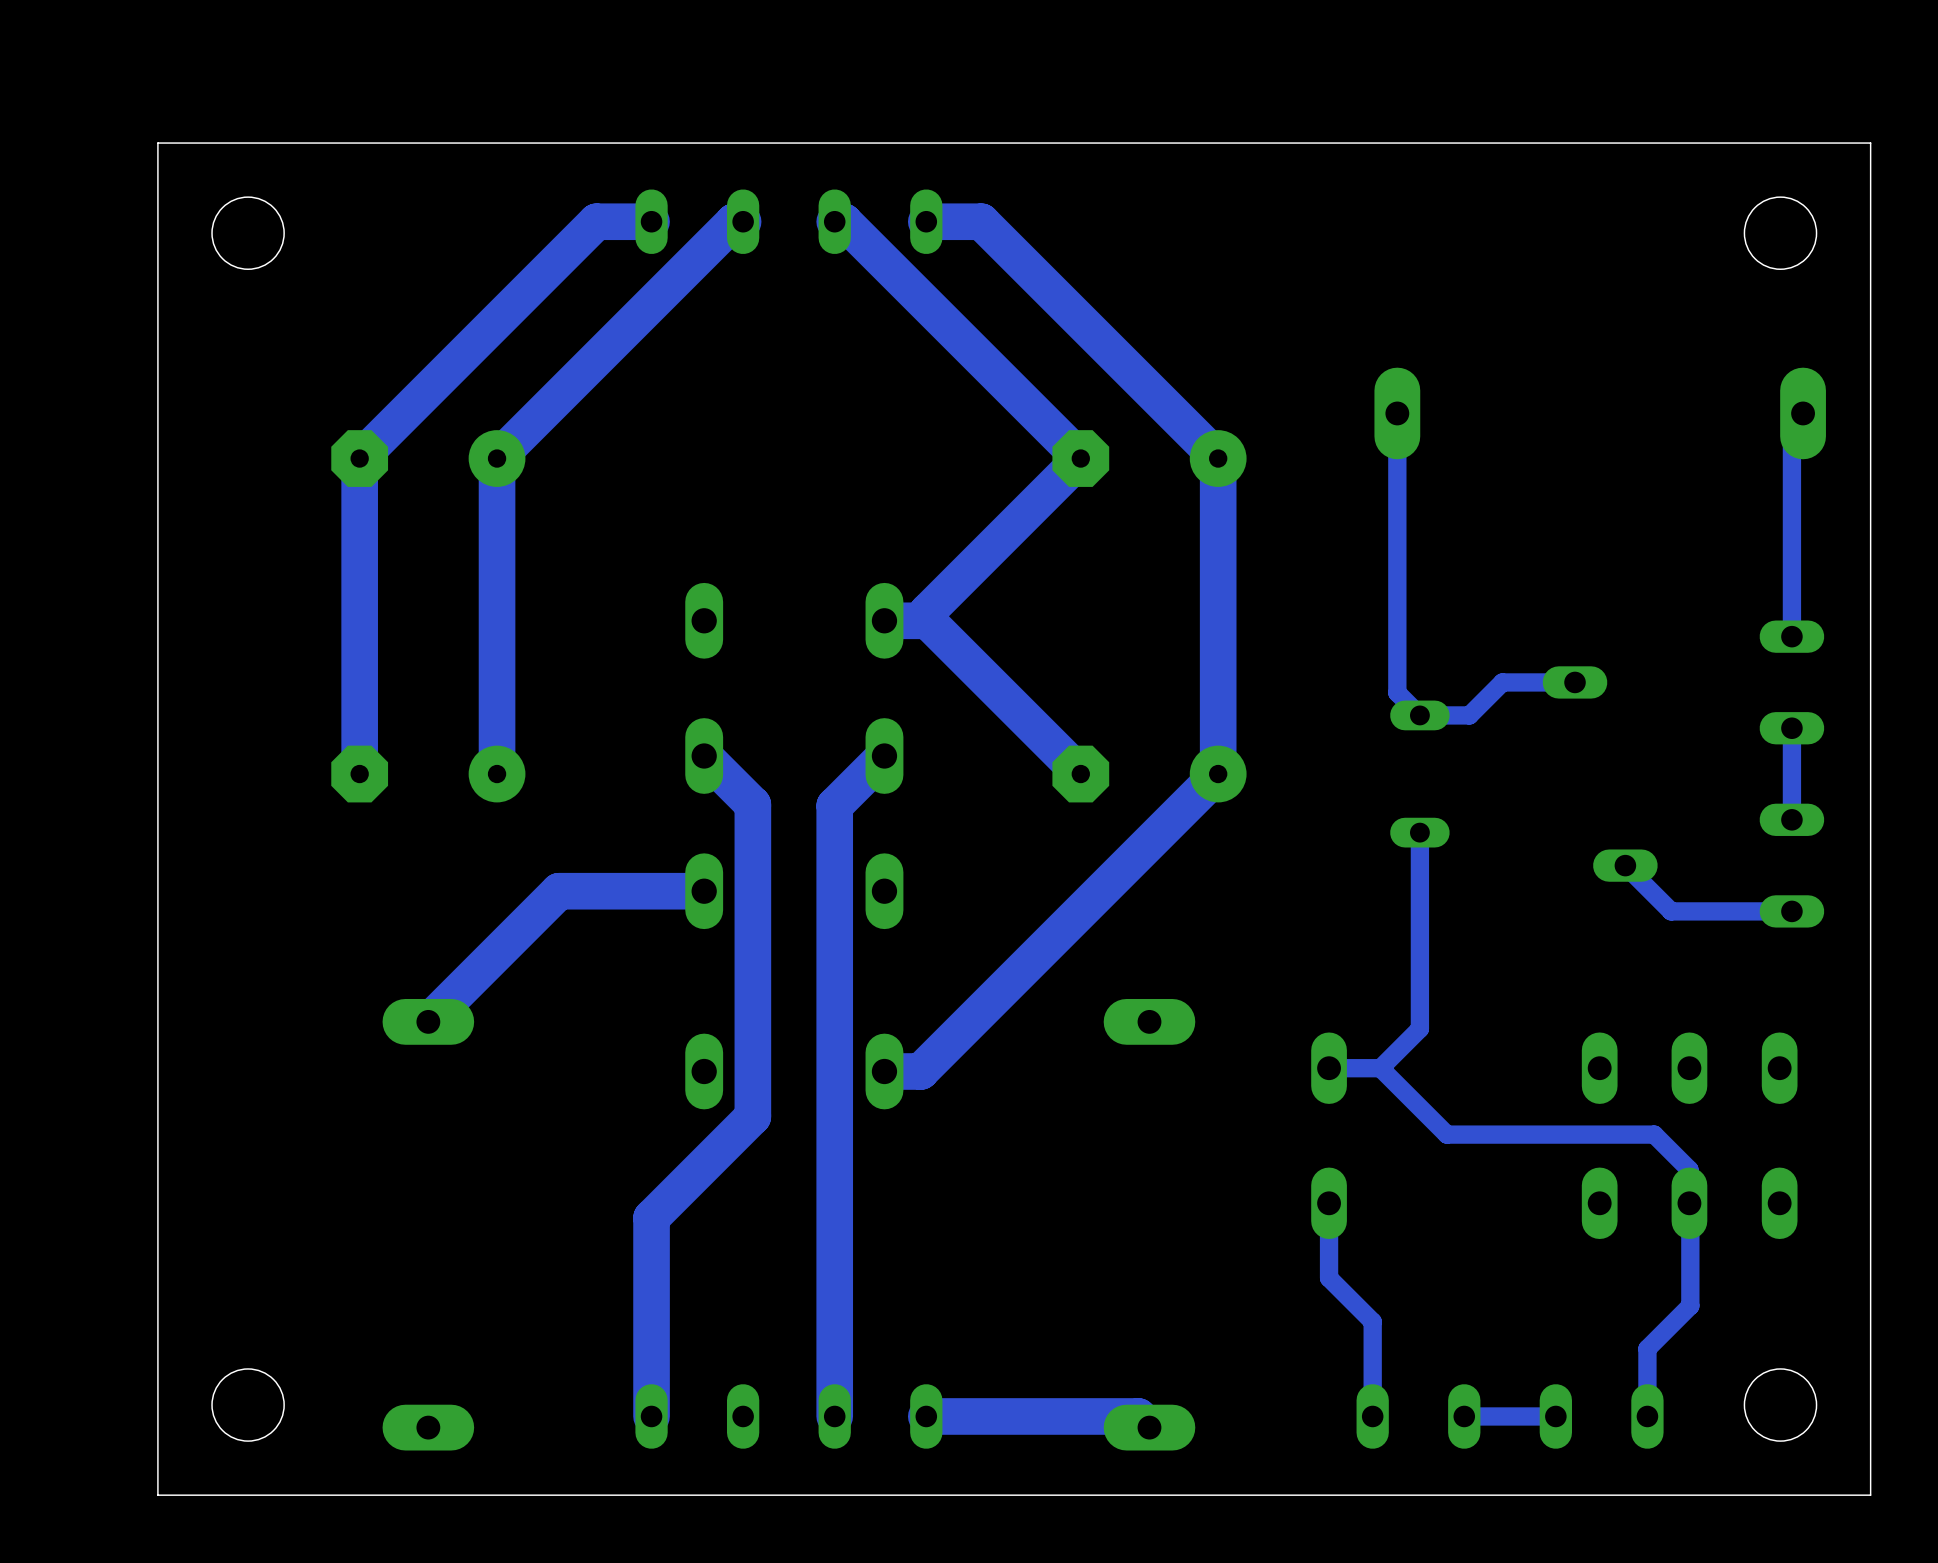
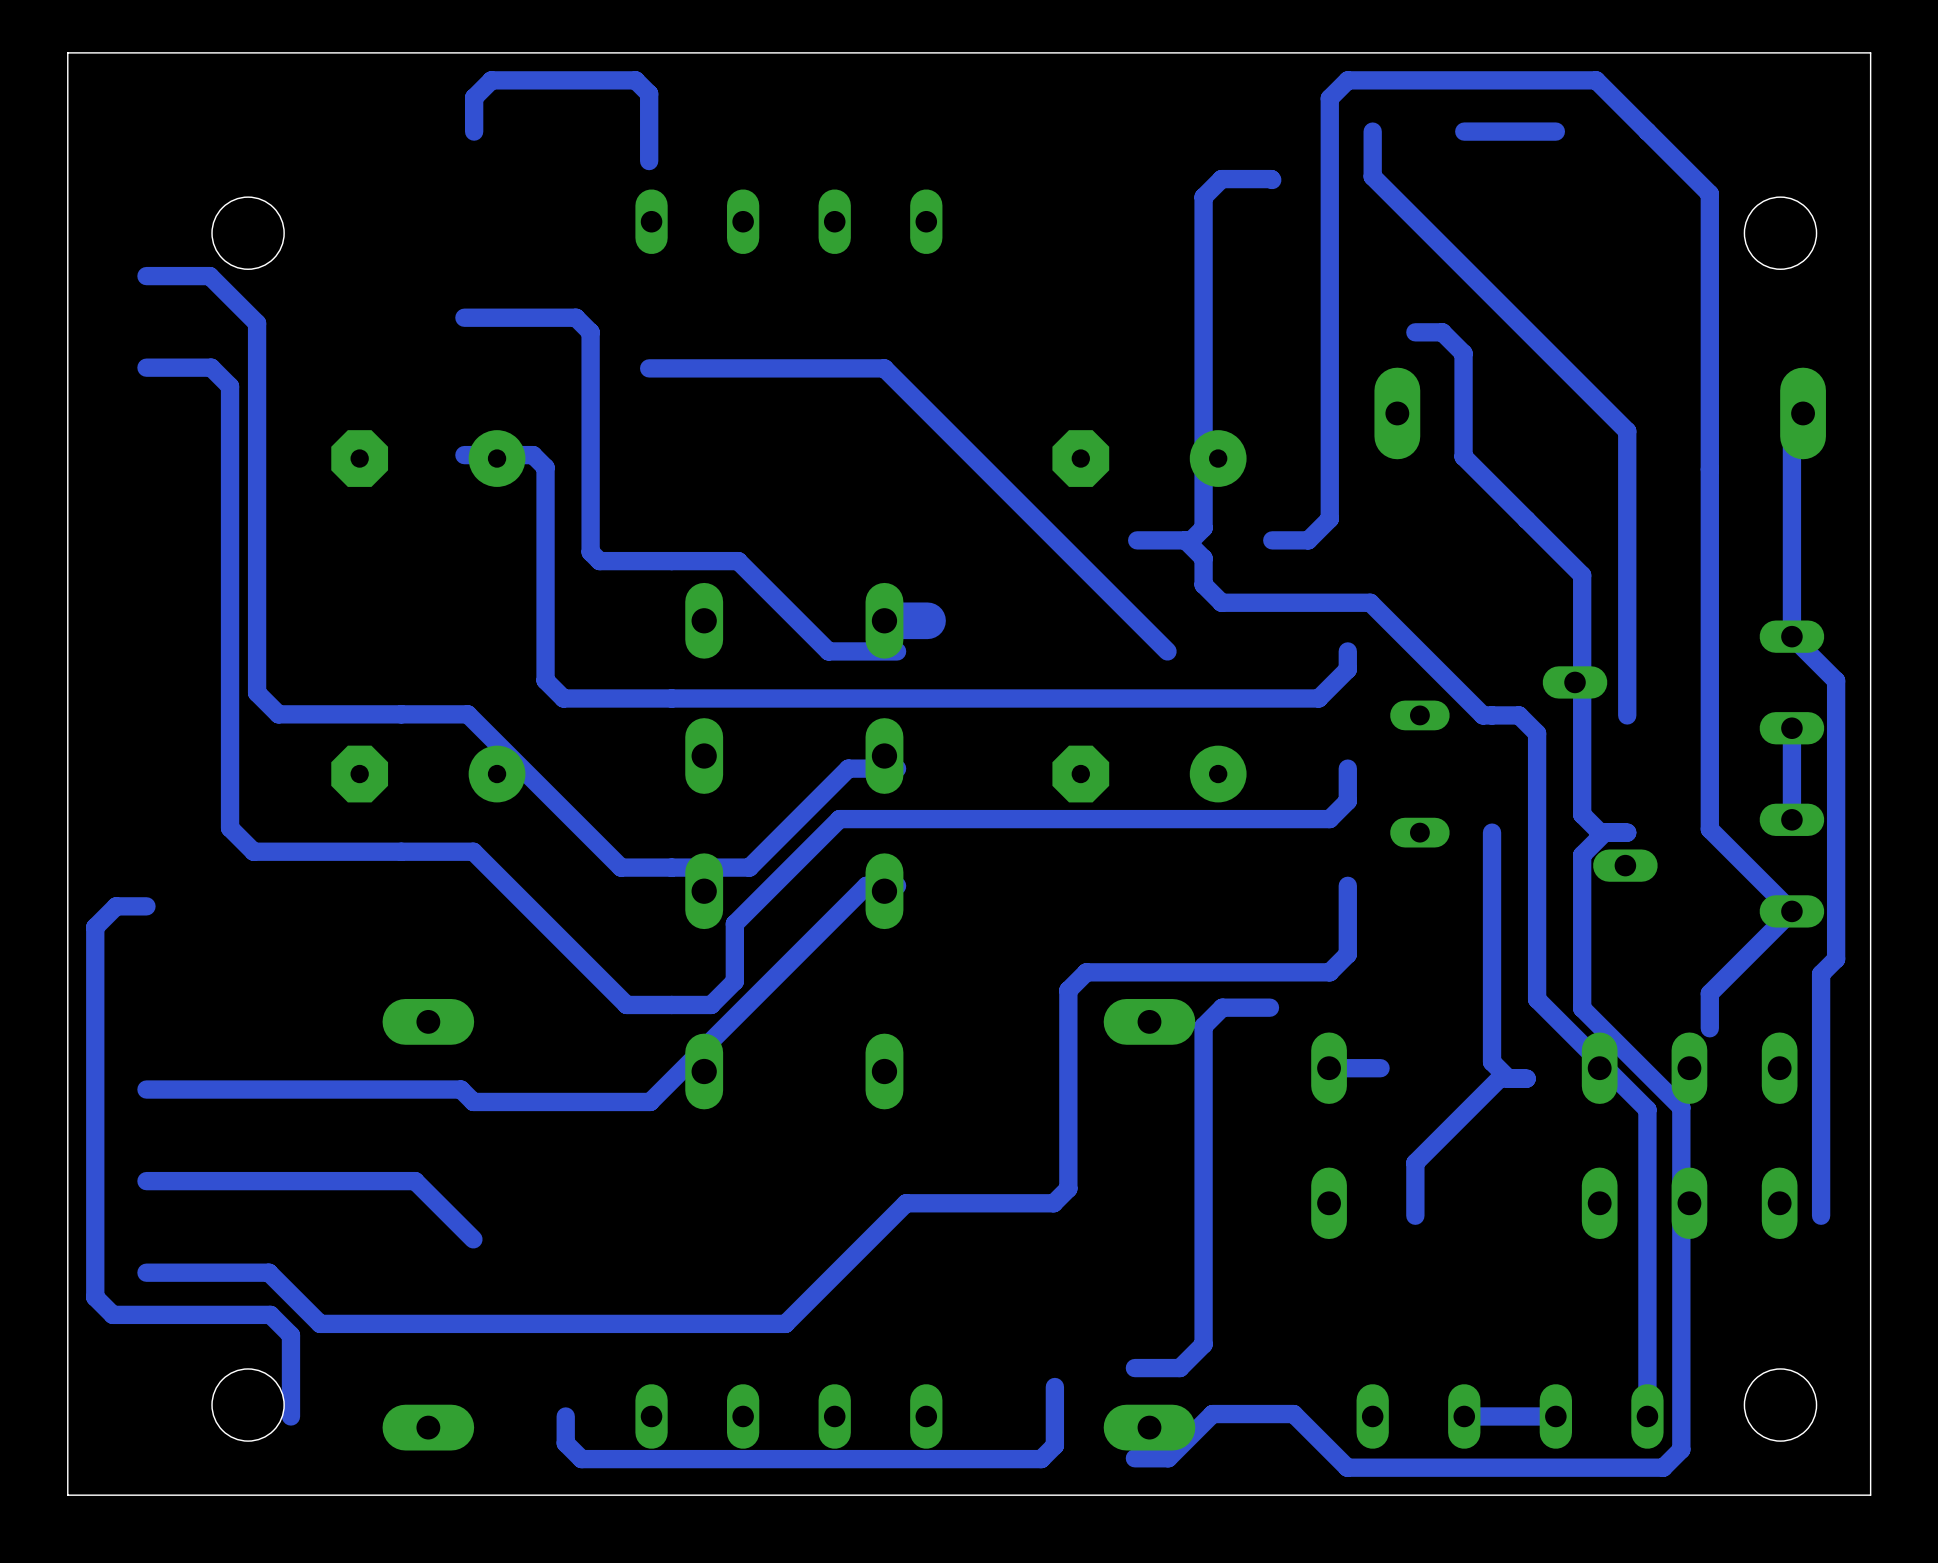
track: none -> (474, 131) (474, 97) (491, 80) (635, 80) (649, 93) (649, 161)
track: none -> (1372, 131) (1372, 176) (1627, 431) (1627, 715)
track: none -> (1555, 131) (1464, 131)
board edge: (1870, 143) (157, 143) (157, 1495) -> (1870, 143) (1870, 52) (67, 52) (67, 1495) (157, 1495)
track: none -> (1272, 180) (1221, 179) (1203, 197) (1203, 528) (1191, 540) (1137, 540)
track: (651, 221) (596, 221) (359, 458) (359, 774) -> none
track: (743, 221) (733, 221) (497, 458) (497, 774) -> none
track: (834, 221) (844, 221) (1080, 458) (927, 611) (927, 620) (1080, 774) -> none
track: (926, 221) (981, 221) (1218, 458) (1218, 774) (920, 1071) (884, 1071) -> none
track: none -> (146, 276) (209, 276) (257, 323) (257, 692) (278, 714) (467, 714) (621, 867) (749, 867) (848, 768) (897, 768)
track: none -> (464, 317) (576, 317) (590, 332) (590, 552) (599, 561) (738, 561) (828, 651) (897, 651)
track: none -> (1415, 332) (1442, 332) (1463, 353) (1463, 456) (1582, 575) (1582, 814) (1600, 832) (1627, 832)
track: none -> (146, 367) (211, 367) (230, 386) (230, 828) (253, 851) (473, 851) (626, 1004) (711, 1004) (734, 981) (734, 923) (839, 819) (1329, 819) (1347, 801) (1347, 768)
track: none -> (649, 368) (884, 368) (1167, 651)
track: (1397, 413) (1397, 692) (1419, 715) (1469, 715) (1502, 682) (1575, 682) -> none
track: none -> (464, 455) (533, 455) (545, 467) (545, 680) (563, 698) (1318, 698) (1347, 669) (1347, 651)
track: none -> (1272, 540) (1308, 540) (1329, 518) (1329, 98) (1347, 80) (1596, 80) (1709, 193) (1709, 829) (1791, 911) (1709, 993) (1709, 1028)
track: none -> (1791, 636) (1836, 680) (1836, 959) (1821, 974) (1821, 1215)
track: (704, 756) (752, 804) (752, 1116) (651, 1217) (651, 1416) -> none
track: (884, 756) (834, 805) (834, 1416) -> none
track: (1419, 832) (1419, 1028) (1380, 1068) (1446, 1134) (1654, 1134) (1689, 1169) (1690, 1305) (1647, 1348) -> (1185, 540) (1203, 558) (1203, 584) (1221, 602) (1370, 602) (1483, 715) (1519, 715) (1537, 733) (1537, 999) (1647, 1109) (1647, 1348)
track: none -> (1492, 832) (1492, 1062) (1508, 1078)
track: none -> (1604, 832) (1582, 855) (1582, 1008) (1681, 1107) (1681, 1449) (1663, 1467) (1347, 1467) (1293, 1414) (1212, 1414) (1168, 1458) (1134, 1458)
track: (1625, 865) (1671, 911) (1791, 911) -> none
track: none -> (897, 885) (866, 885) (650, 1101) (473, 1101) (460, 1089) (146, 1089)
track: none -> (1347, 885) (1347, 954) (1329, 972) (1086, 972) (1068, 990) (1068, 1188) (1053, 1203) (906, 1203) (785, 1323) (320, 1323) (268, 1272) (146, 1272)
track: (704, 891) (559, 891) (428, 1021) -> none
track: none -> (146, 906) (116, 906) (95, 927) (95, 1297) (112, 1314) (270, 1314) (290, 1335) (290, 1416)
track: none -> (1269, 1007) (1222, 1007) (1203, 1026) (1203, 1344) (1179, 1368) (1134, 1368)
track: none -> (1526, 1078) (1499, 1078) (1415, 1162) (1415, 1215)
track: none -> (146, 1181) (415, 1181) (473, 1239)
track: (1329, 1203) (1329, 1278) (1372, 1321) (1372, 1416) -> none
track: none -> (1054, 1387) (1054, 1445) (1041, 1459) (581, 1459) (565, 1443) (565, 1416)
track: (926, 1416) (1138, 1416) (1149, 1427) -> none

